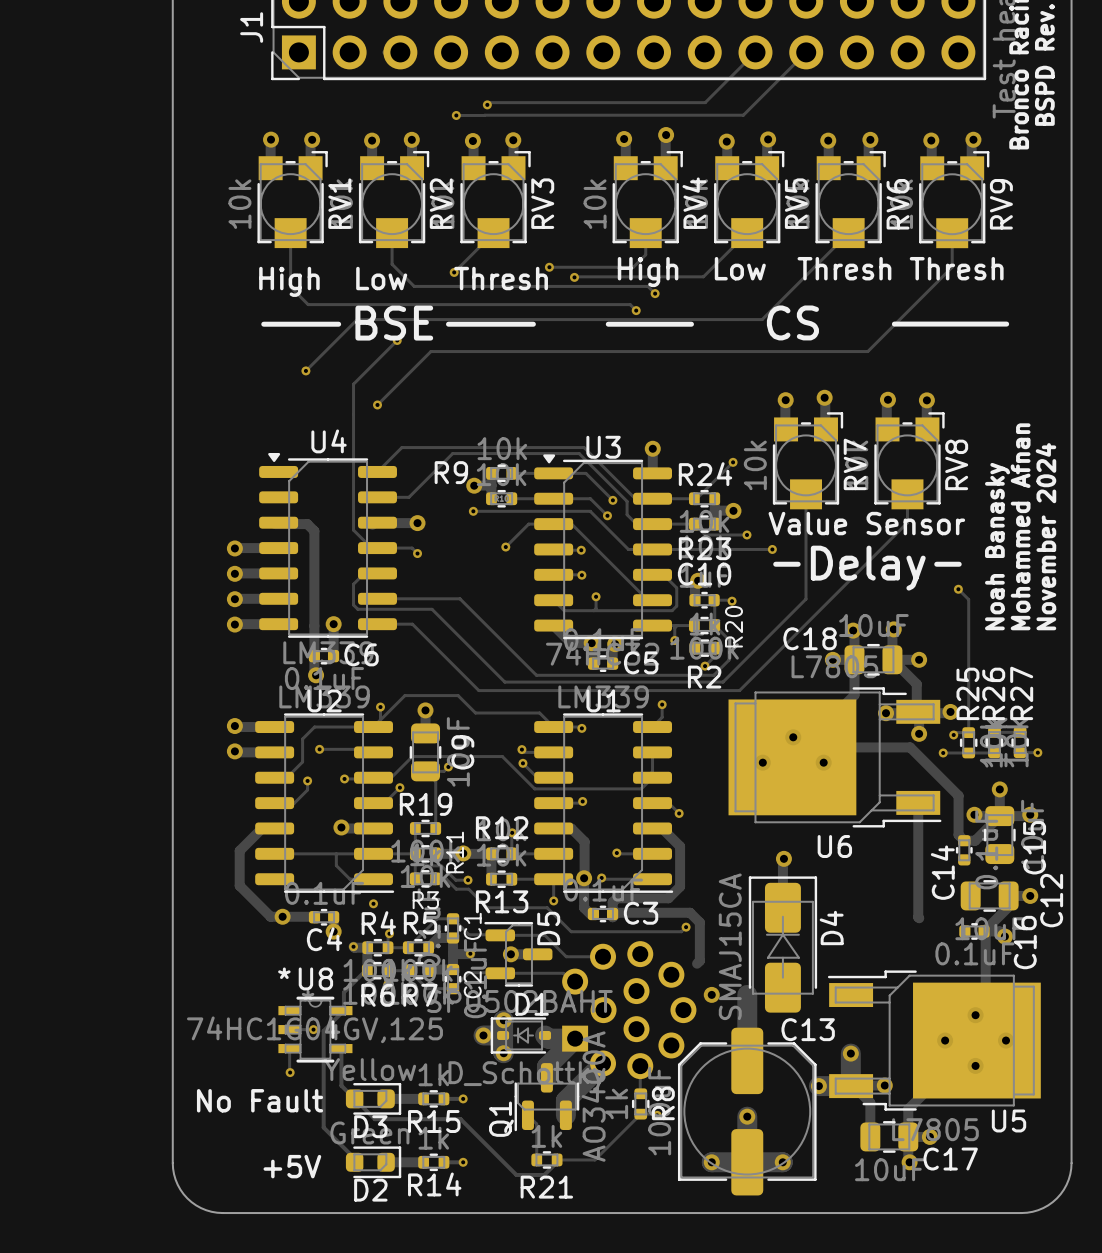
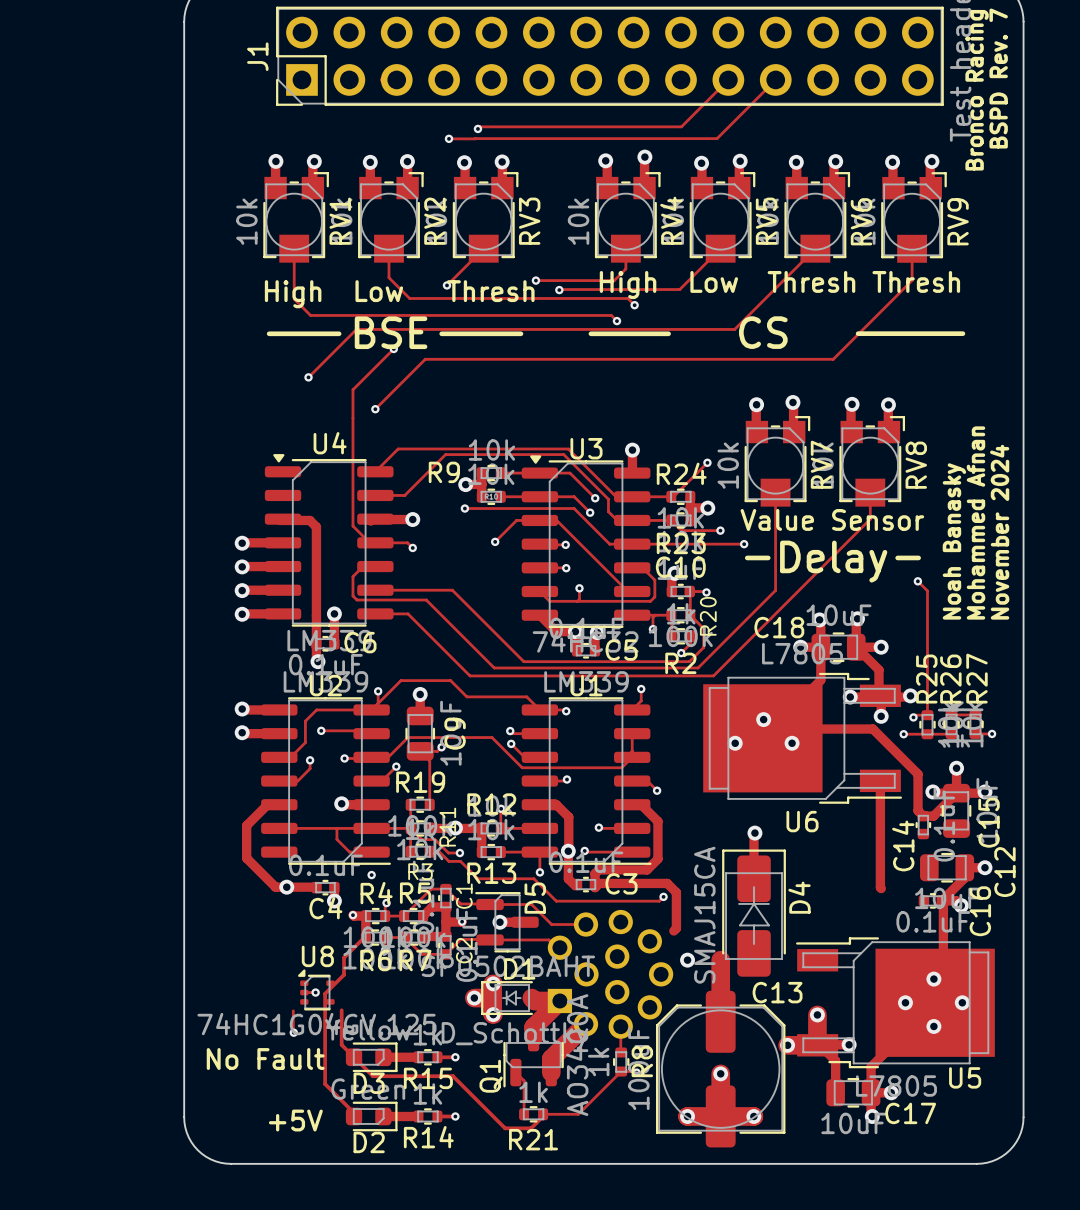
U8 footprint: [278, 996, 353, 1063] -> [298, 969, 335, 1011]

